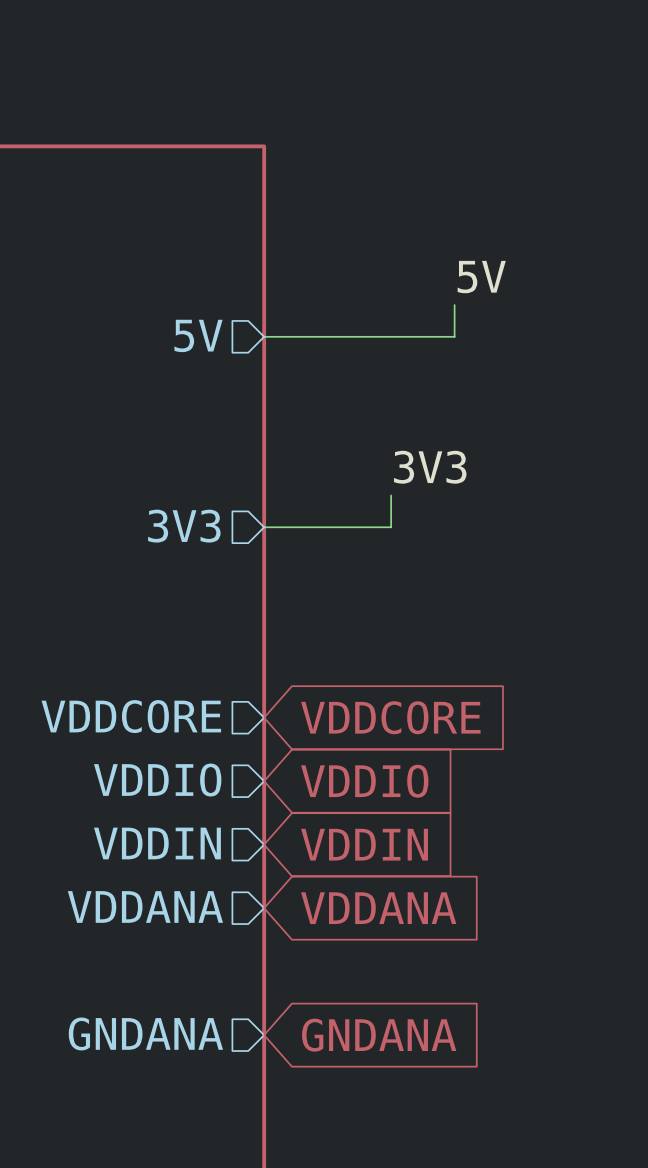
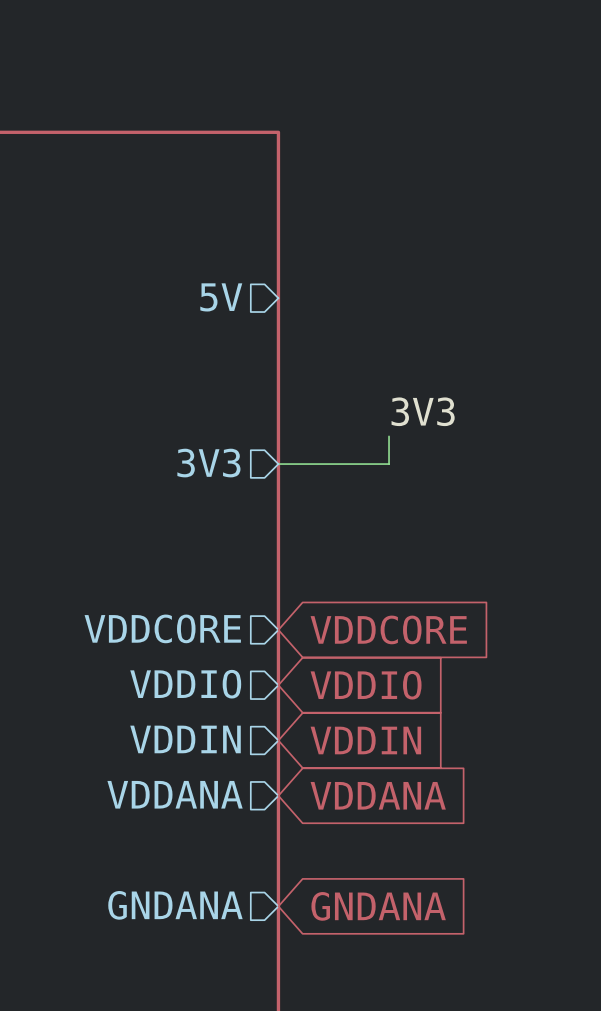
label: 5V (481, 277) -> none
wire: (454, 305) (454, 336) (264, 336) -> none

